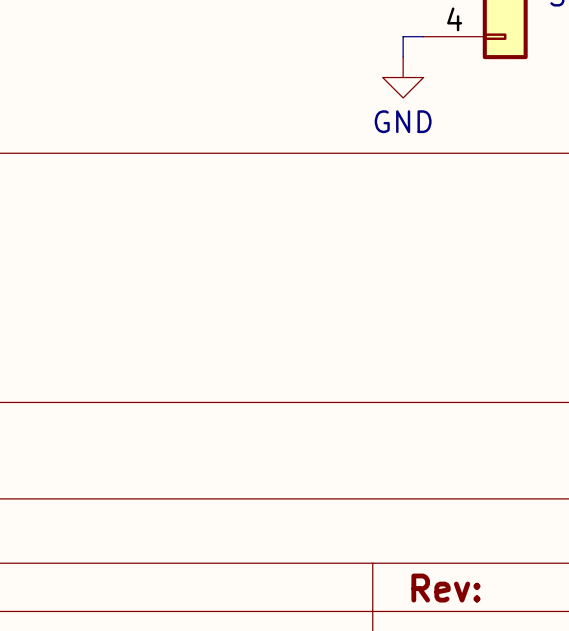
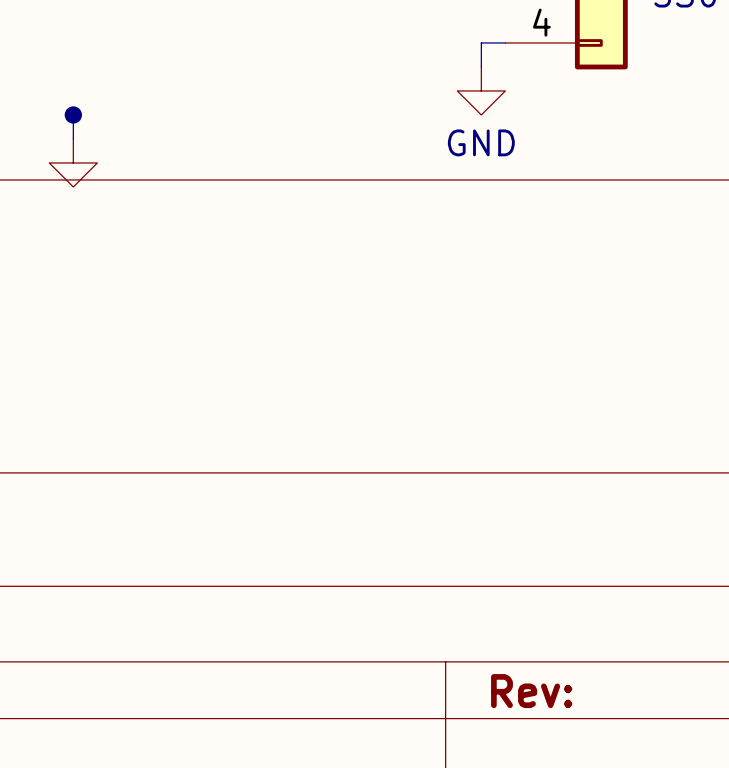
wire: none -> (73, 114) (73, 138)
junction: none -> (73, 114)
power symbol: none -> (73, 162)

